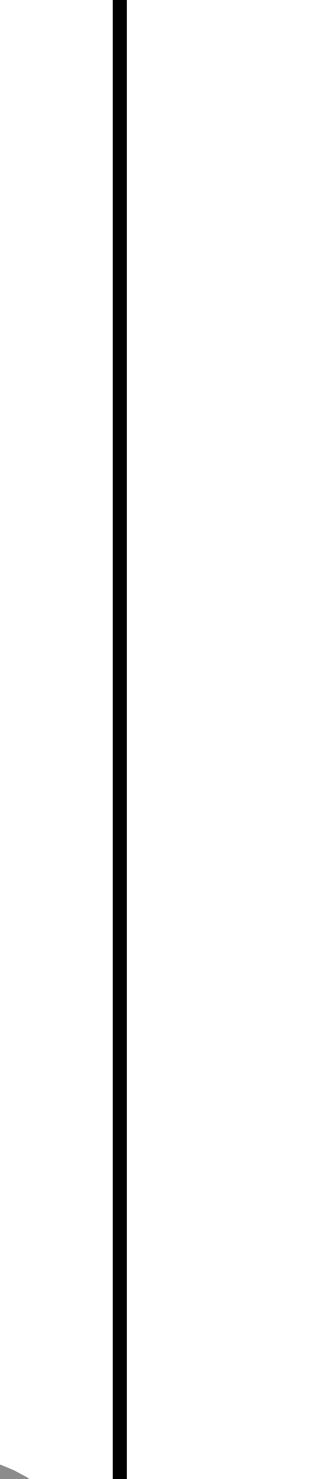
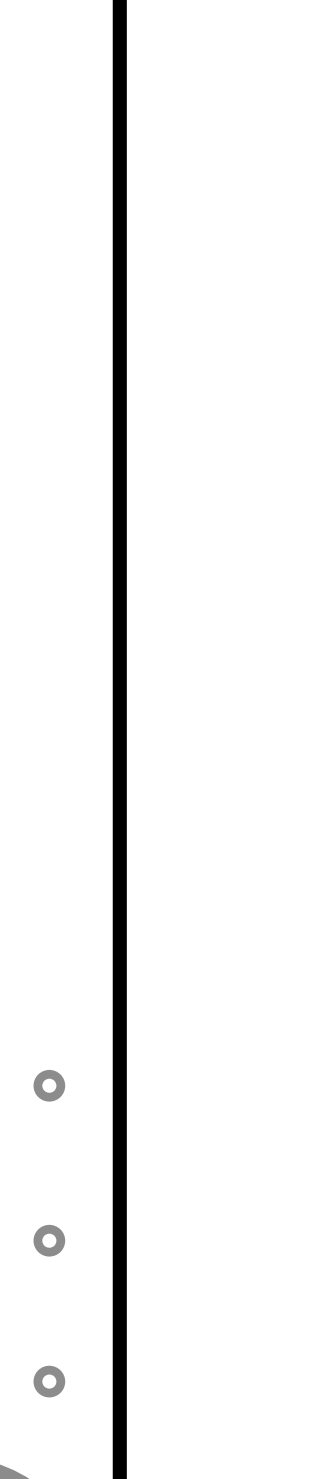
via: none -> (49, 1085)
via: none -> (49, 1240)
via: none -> (49, 1381)

